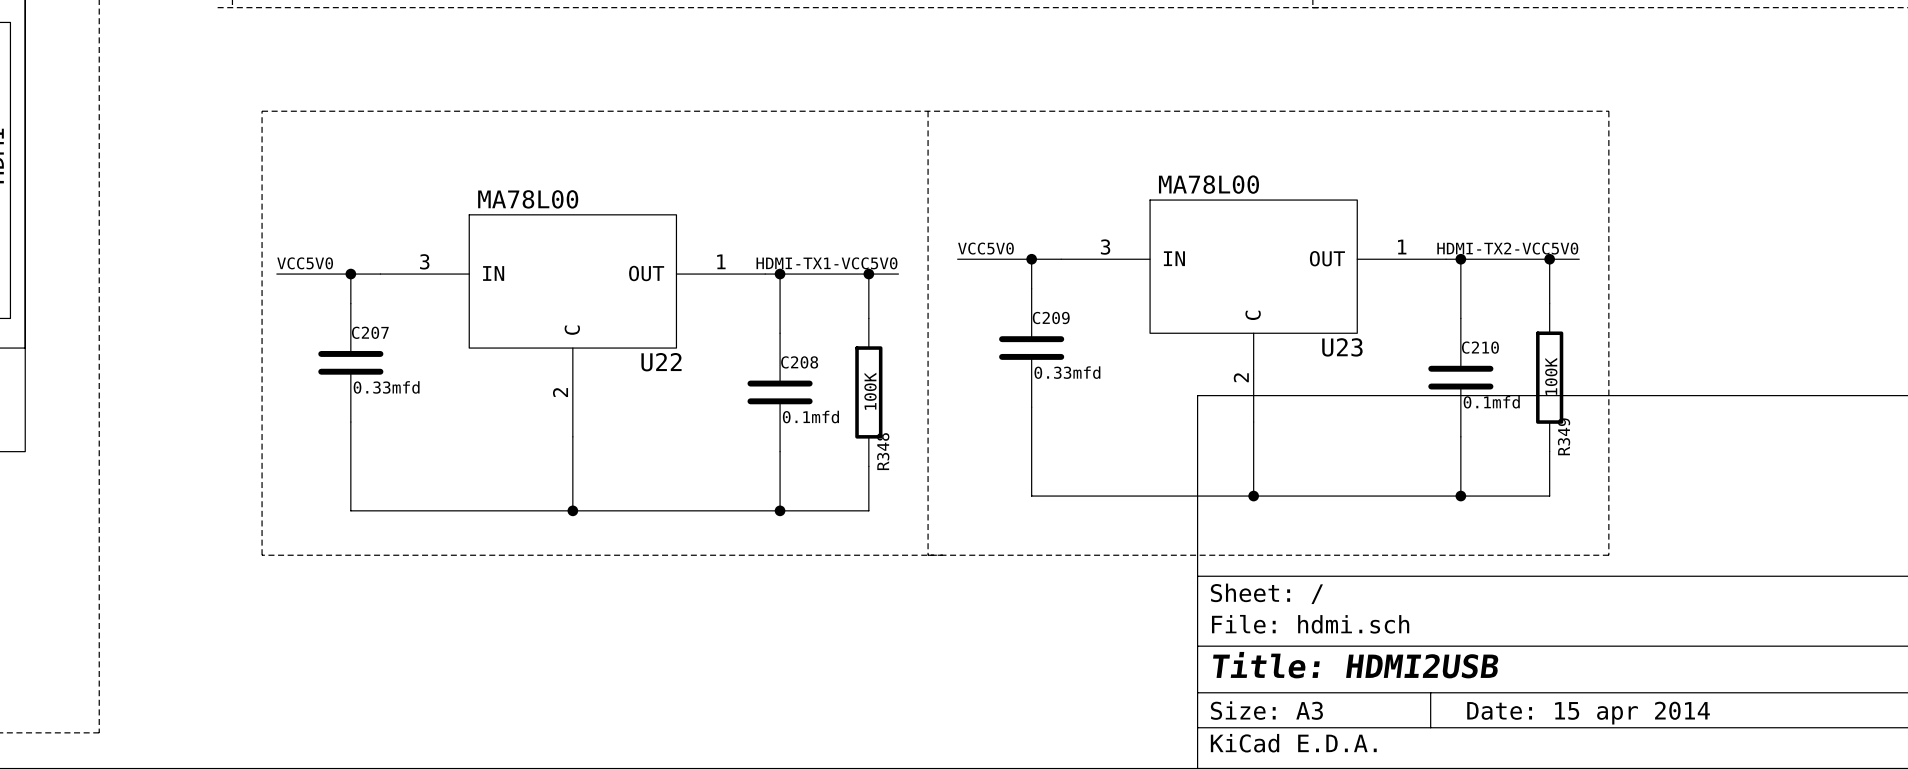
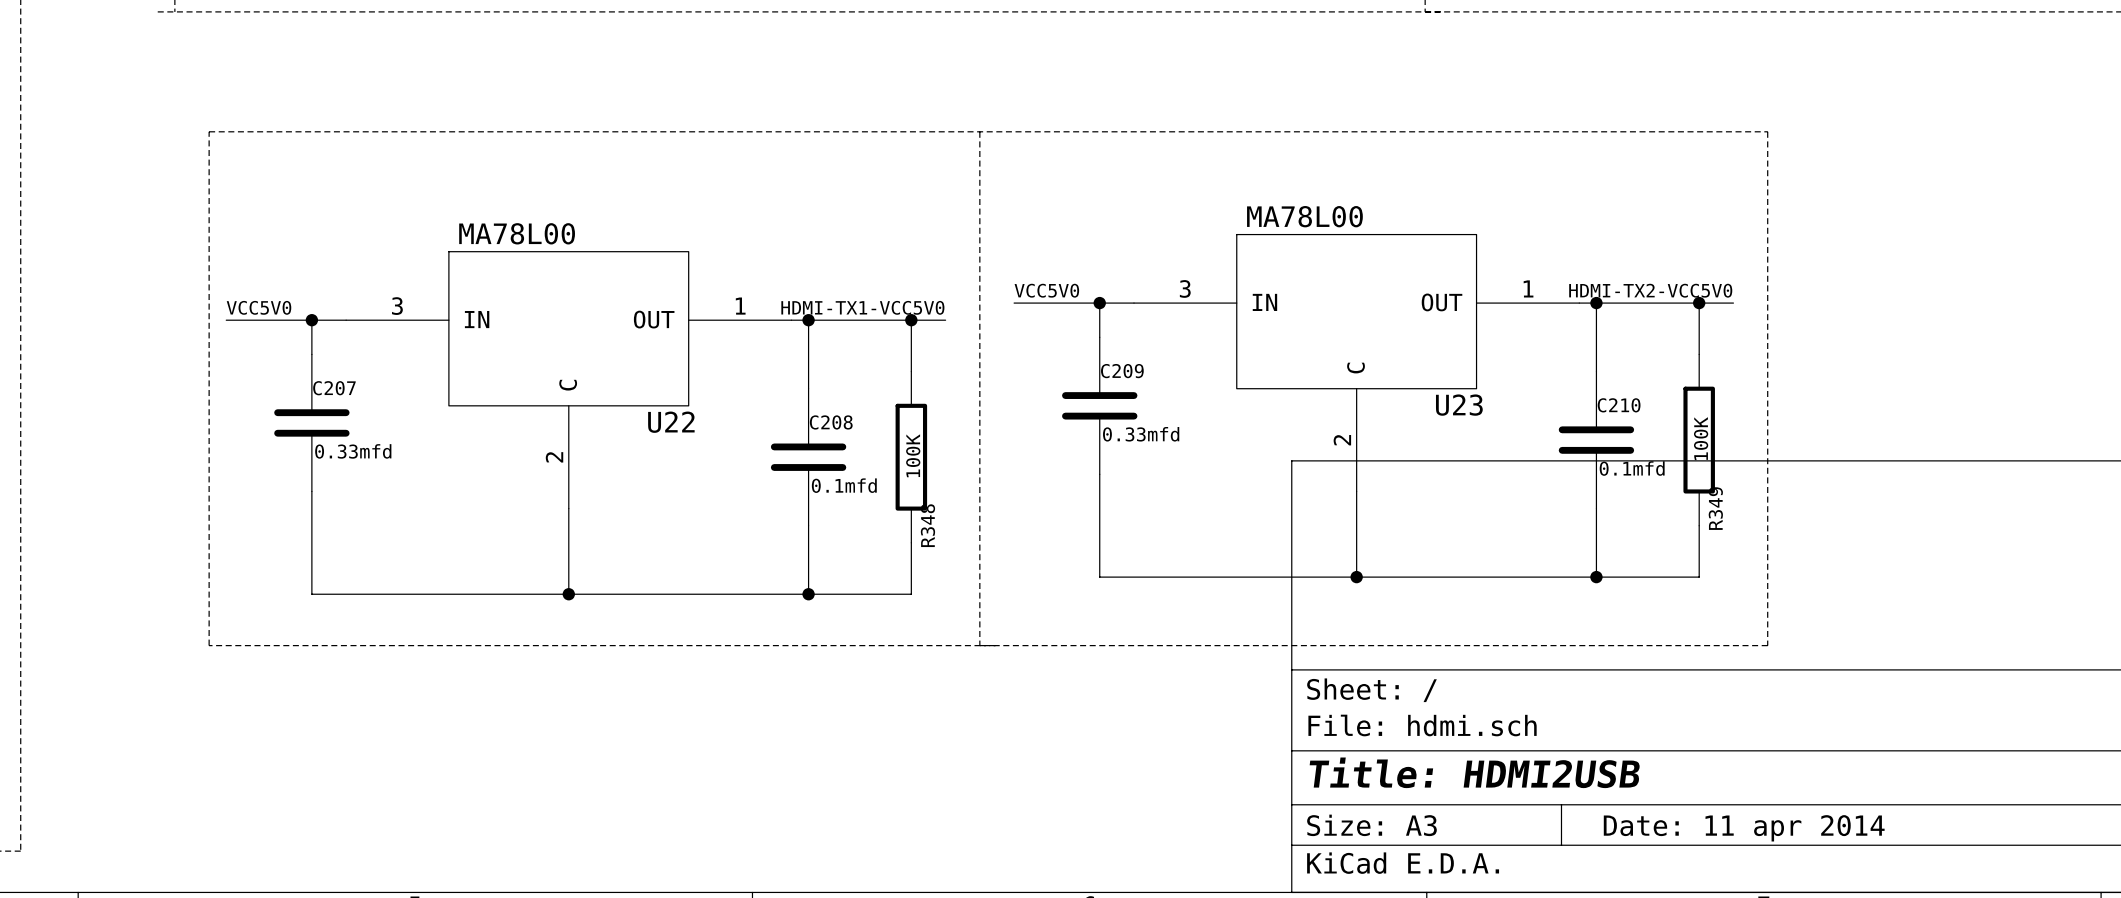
title block: Date: 15 apr 2014 (1588, 713) -> Date: 11 apr 2014 (1744, 828)

